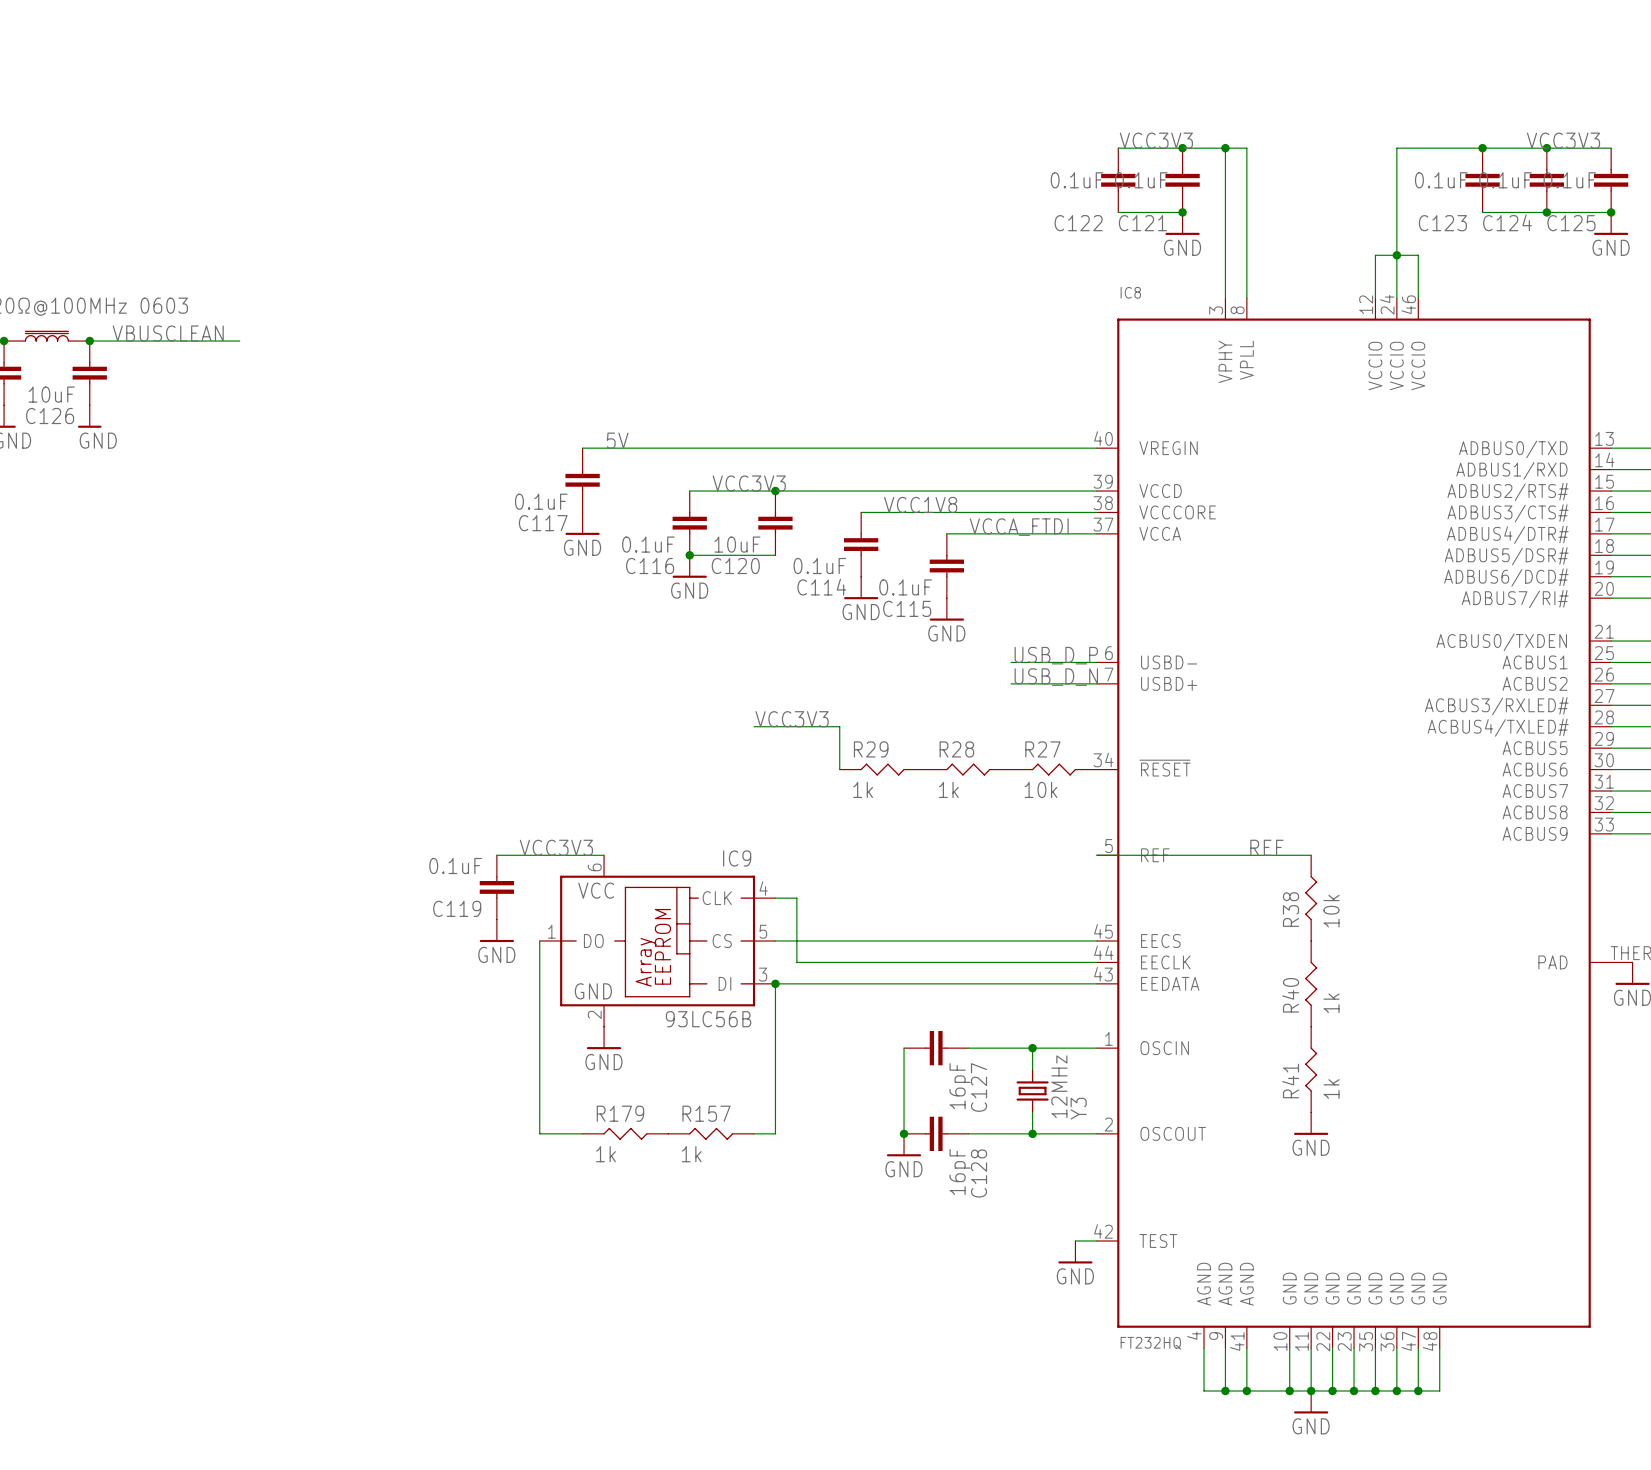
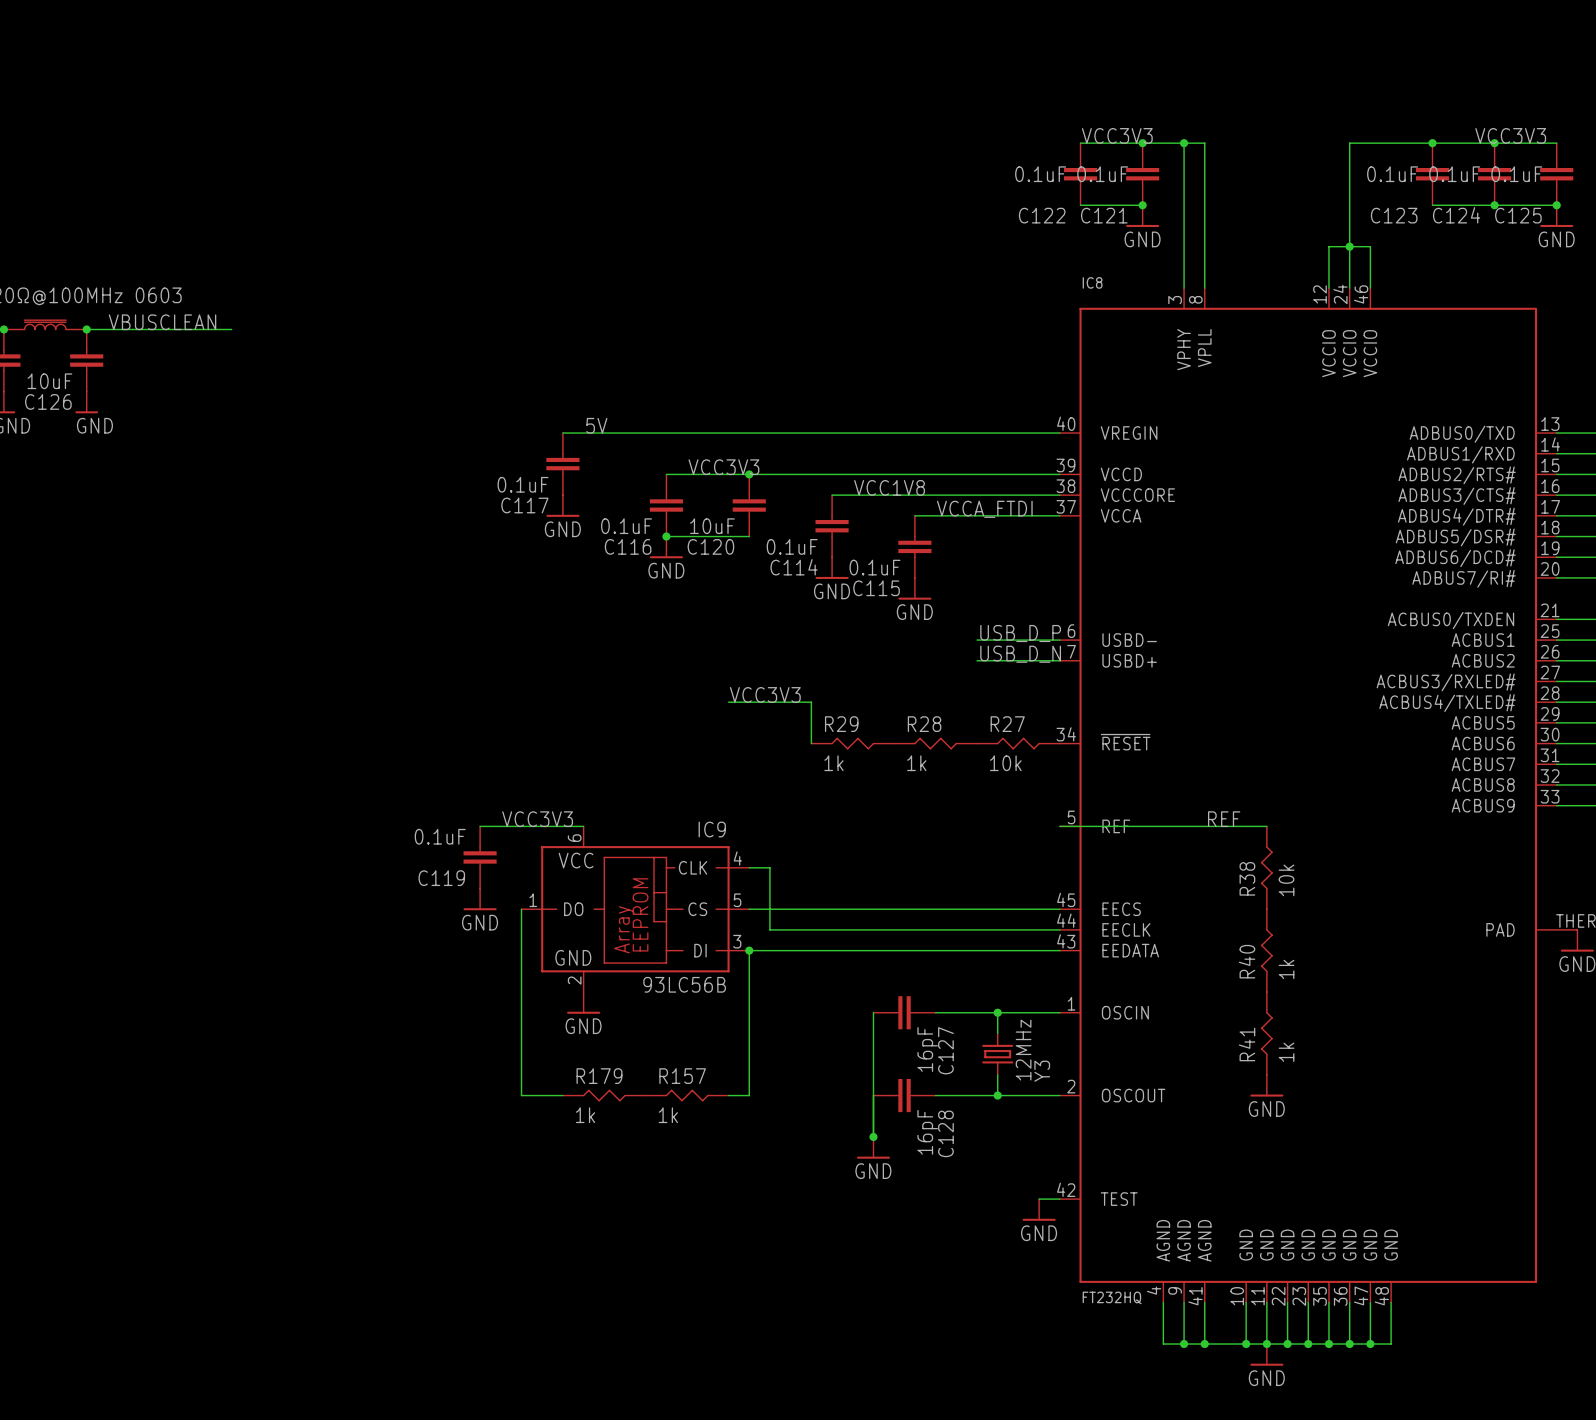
junction position: (904, 1133) -> (873, 1136)
power symbol position: GND (904, 1145) -> GND (873, 1147)

